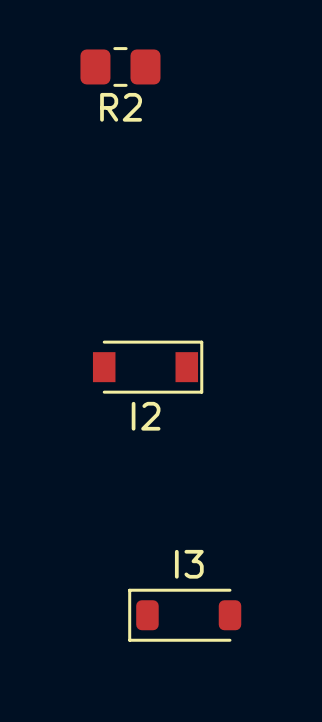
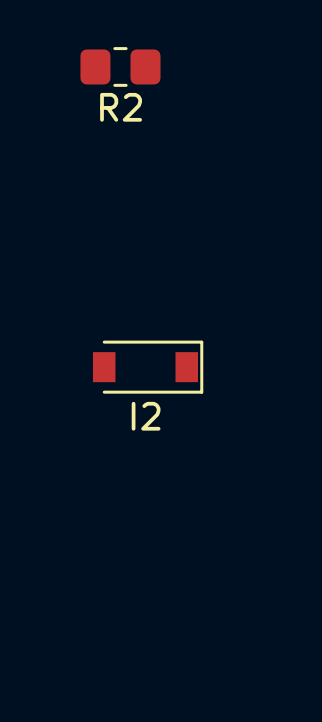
I3: (184, 615) -> none

